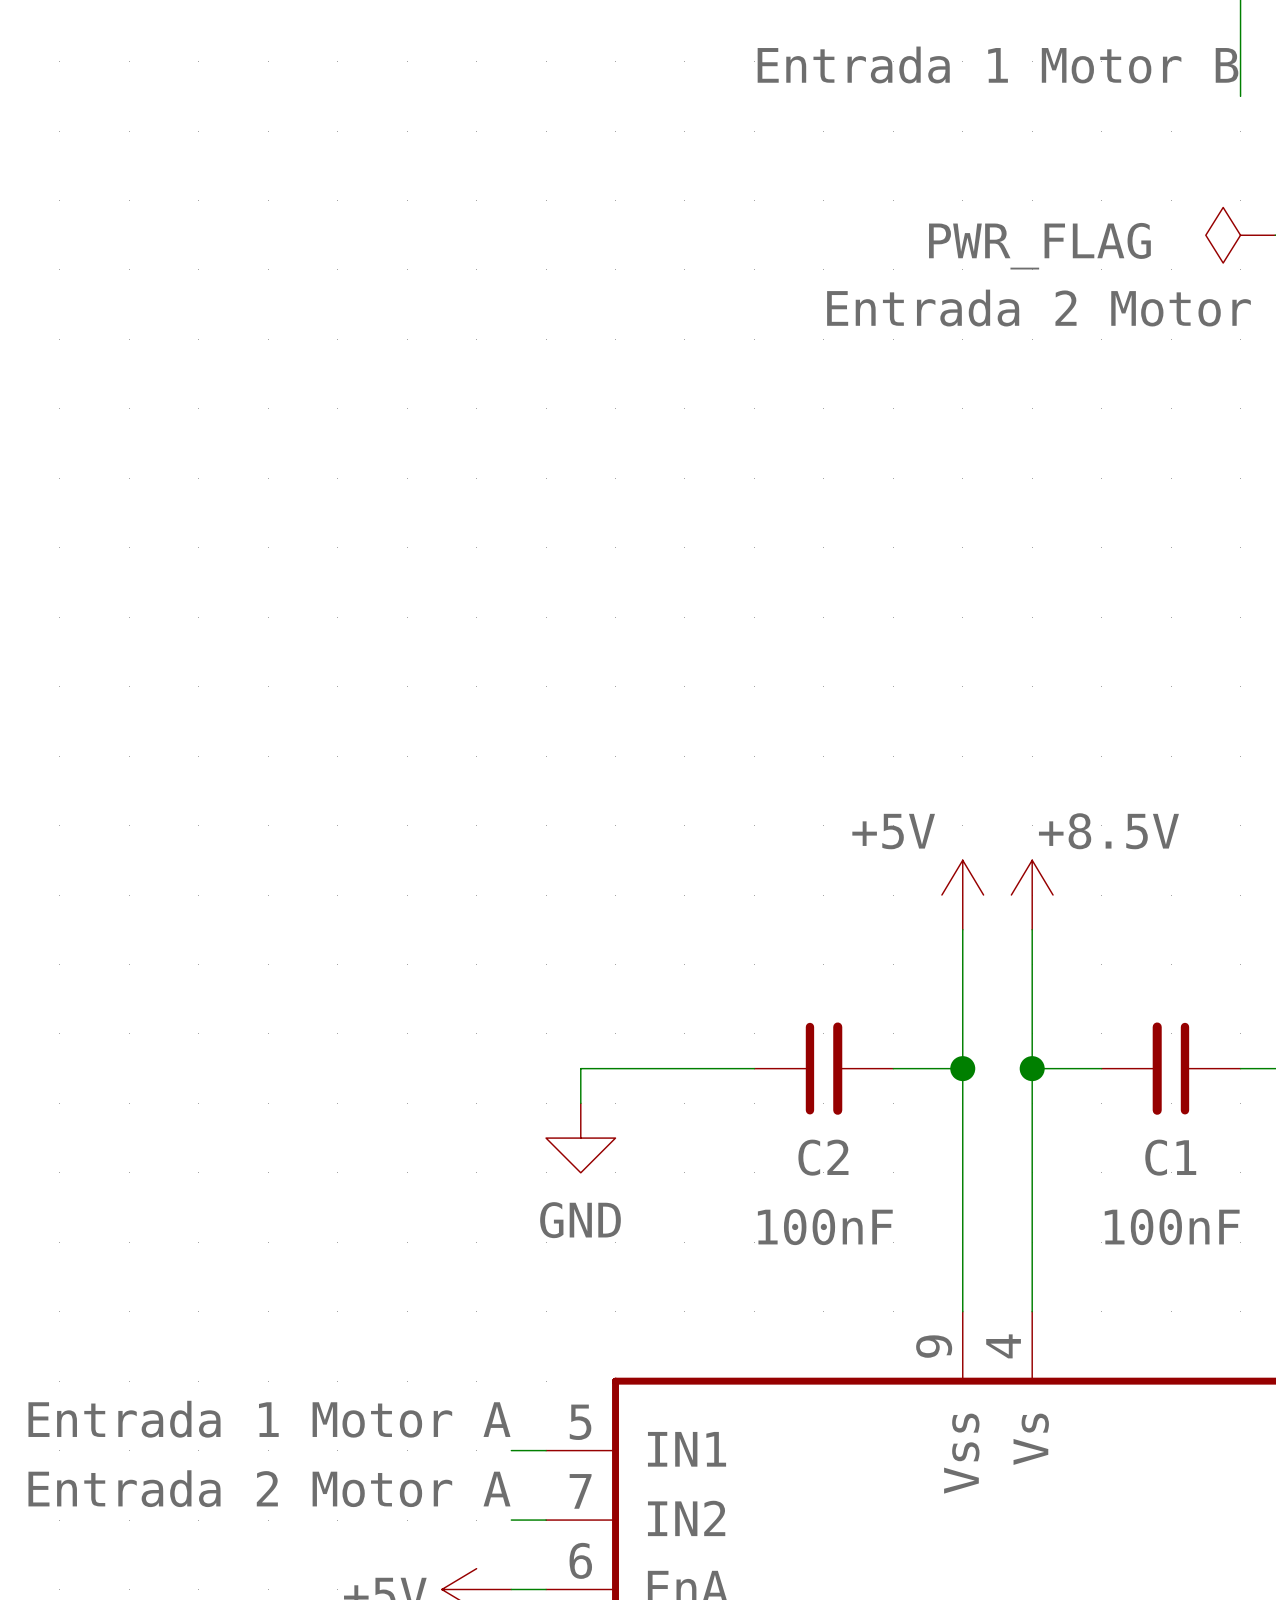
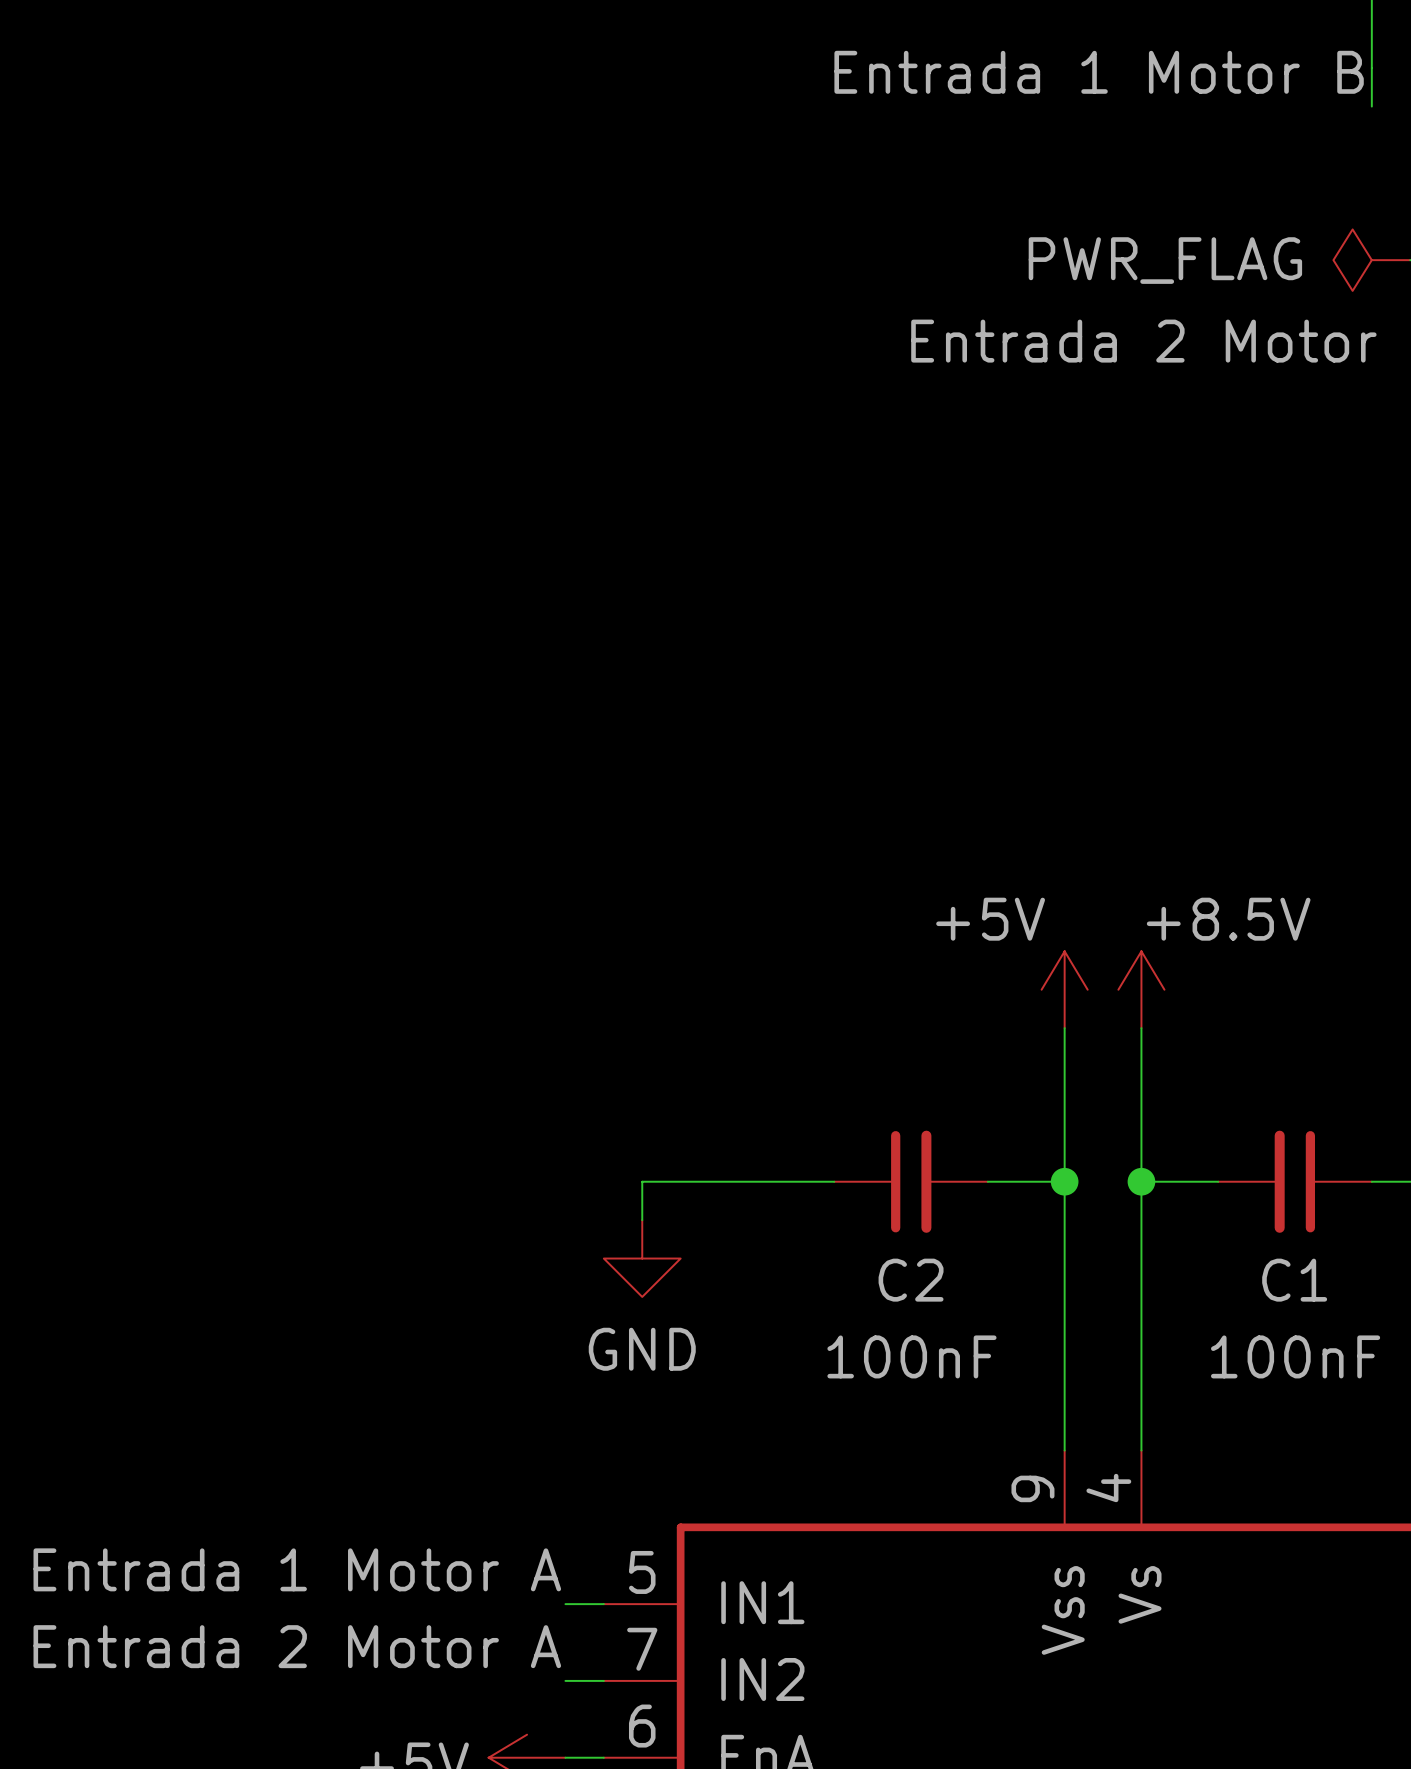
power symbol text position: PWR_FLAG (1039, 246) -> PWR_FLAG (1165, 260)

